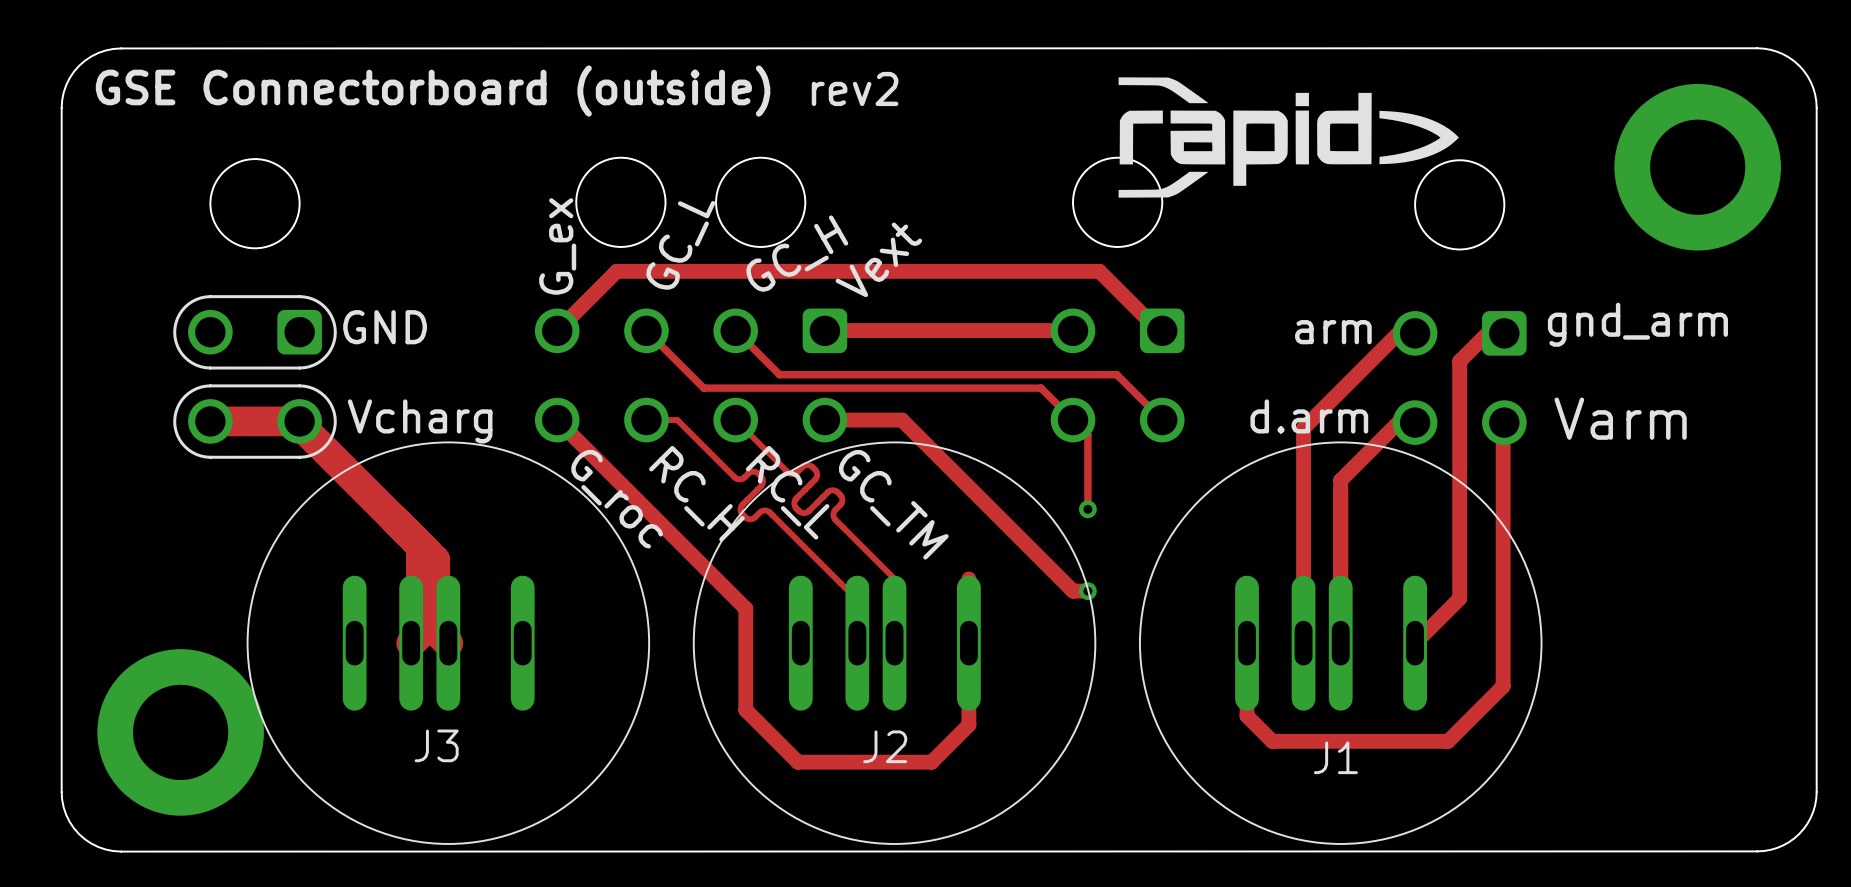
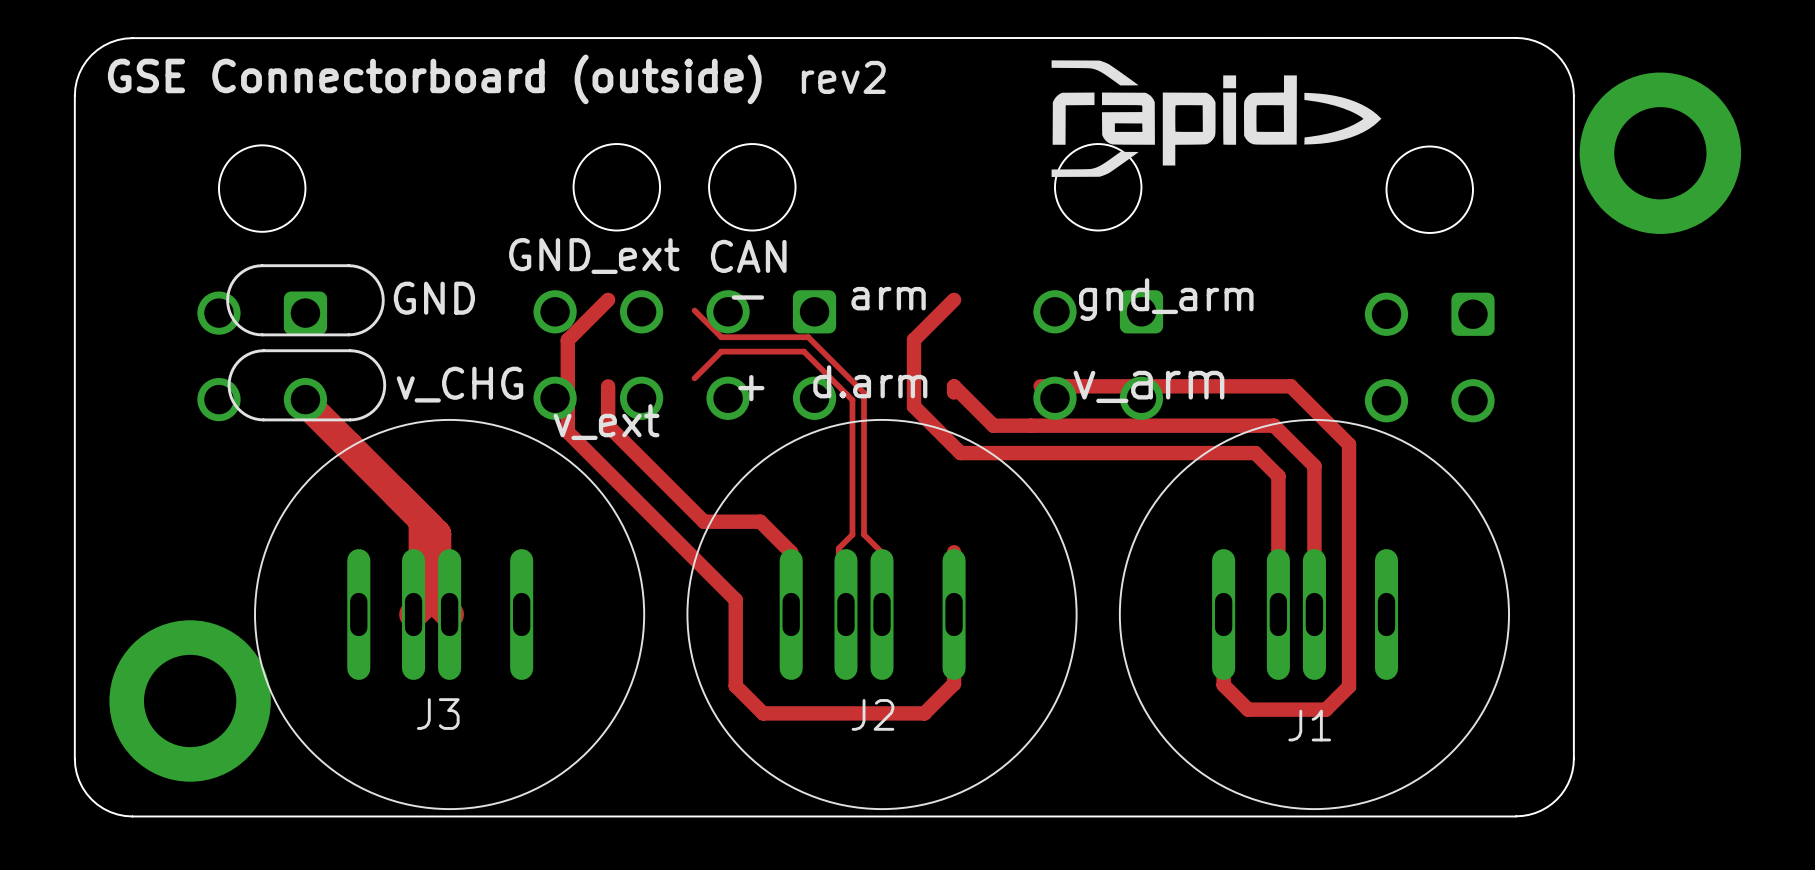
board edge: (1548, 48) (1763, 48) (1782, 54) (1794, 61) (1807, 76) (1813, 88) (1816, 107) (1816, 791) (1810, 817) (1803, 829) (1788, 842) (1770, 849) (1757, 851) (121, 851) -> (1516, 816) (132, 816)
board edge: none -> (1516, 37) (1541, 43) (1556, 54) (1568, 70) (1573, 95)
board edge: none -> (1573, 95) (1573, 758)
drawing position: (1288, 137) -> (1216, 118)
text: GC_L (680, 245) -> none
text: G_ex (557, 246) -> GND_ext (594, 256)
text: GC_H (797, 253) -> - (747, 297)
text: Vext (878, 259) -> none
text: none -> CAN (748, 256)
line: none -> (262, 265) (348, 265) (361, 268) (373, 275) (380, 287) (383, 300) (380, 313) (369, 327) (353, 334) (262, 334) (249, 332) (239, 326) (233, 319) (228, 308) (227, 296) (231, 284) (239, 274) (249, 267) (262, 265)
line: (210, 296) (299, 296) (313, 299) (324, 307) (332, 318) (335, 332) (332, 345) (321, 360) (304, 367) (210, 368) (196, 365) (188, 360) (179, 350) (175, 336) (175, 327) (179, 314) (185, 307) (196, 299) (210, 296) -> none
text position: gnd_arm (1637, 324) -> gnd_arm (1166, 299)
text position: GND (385, 327) -> GND (434, 298)
track: none -> (694, 310) (721, 337) (808, 337) (864, 392) (864, 534) (882, 552)
track: (557, 330) (616, 271) (1099, 271) (1158, 330) (1162, 330) -> none
track: (646, 330) (703, 388) (1041, 388) (1087, 434) (1087, 509) -> none
track: (735, 330) (779, 374) (1116, 374) (1162, 420) -> none
track: (825, 330) (1057, 330) -> none
track: (1400, 331) (1303, 428) (1303, 500) -> (954, 299) (914, 339) (914, 406) (960, 453) (1255, 453) (1278, 476)
track: (1489, 331) (1459, 361) (1459, 598) (1415, 643) -> none
text position: arm (1333, 332) -> arm (888, 298)
line: none -> (263, 350) (350, 350) (362, 352) (373, 359) (380, 369) (384, 381) (382, 397) (378, 404) (369, 413) (354, 419) (263, 419) (251, 417) (240, 411) (233, 401) (229, 389) (230, 377) (235, 365) (244, 356) (255, 351) (263, 350)
line: (210, 385) (299, 385) (313, 388) (324, 396) (332, 407) (335, 421) (332, 435) (321, 449) (304, 456) (210, 457) (196, 454) (185, 446) (179, 439) (175, 426) (175, 416) (177, 407) (185, 396) (196, 388) (210, 385) -> none
track: none -> (694, 378) (721, 351) (803, 351) (852, 400) (852, 534) (838, 548) (838, 617)
text: none -> v_CHG (459, 384)
track: none -> (608, 386) (608, 425) (704, 521) (760, 521) (791, 552) (791, 614)
text: none -> v_arm (1148, 386)
text: none -> + (751, 388)
text position: d.arm (1309, 416) -> d.arm (870, 381)
text: Varm (1620, 418) -> none
track: (557, 420) (745, 608) (745, 710) (797, 762) (931, 762) (968, 724) (968, 714) -> (608, 299) (567, 340) (567, 432) (735, 599) (735, 686) (763, 713) (924, 713) (954, 683)
track: (646, 420) (677, 420) (735, 477) (742, 478) (753, 471) (760, 476) (761, 484) (741, 505) (741, 513) (750, 519) (762, 511) (769, 512) (857, 600) (857, 643) -> none
track: (735, 420) (789, 473) (795, 473) (806, 465) (815, 470) (815, 479) (794, 500) (794, 506) (799, 511) (807, 512) (830, 490) (835, 490) (840, 495) (842, 501) (833, 512) (834, 518) (894, 578) (894, 643) -> none
track: (824, 420) (901, 420) (1073, 591) (1087, 591) -> none
track: (1400, 420) (1340, 480) (1340, 489) -> (954, 392) (954, 386) (993, 425) (1274, 425) (1314, 466)
track: (1502, 420) (1504, 422) (1503, 686) (1448, 741) (1352, 741) -> (1040, 386) (1290, 386) (1349, 444) (1349, 686) (1325, 709)
track: (210, 421) (299, 421) -> none
text: Vcharg (420, 421) -> none
text: RC_L (787, 492) -> none
text: RC_H (696, 493) -> none
text: G_roc (617, 499) -> v_ext (606, 422)
text: GC_TM (893, 504) -> none
via: (1087, 509) -> none
via: (1087, 591) -> none
board edge: none -> (1573, 758) (1570, 777) (1556, 799) (1535, 813) (1516, 816)

